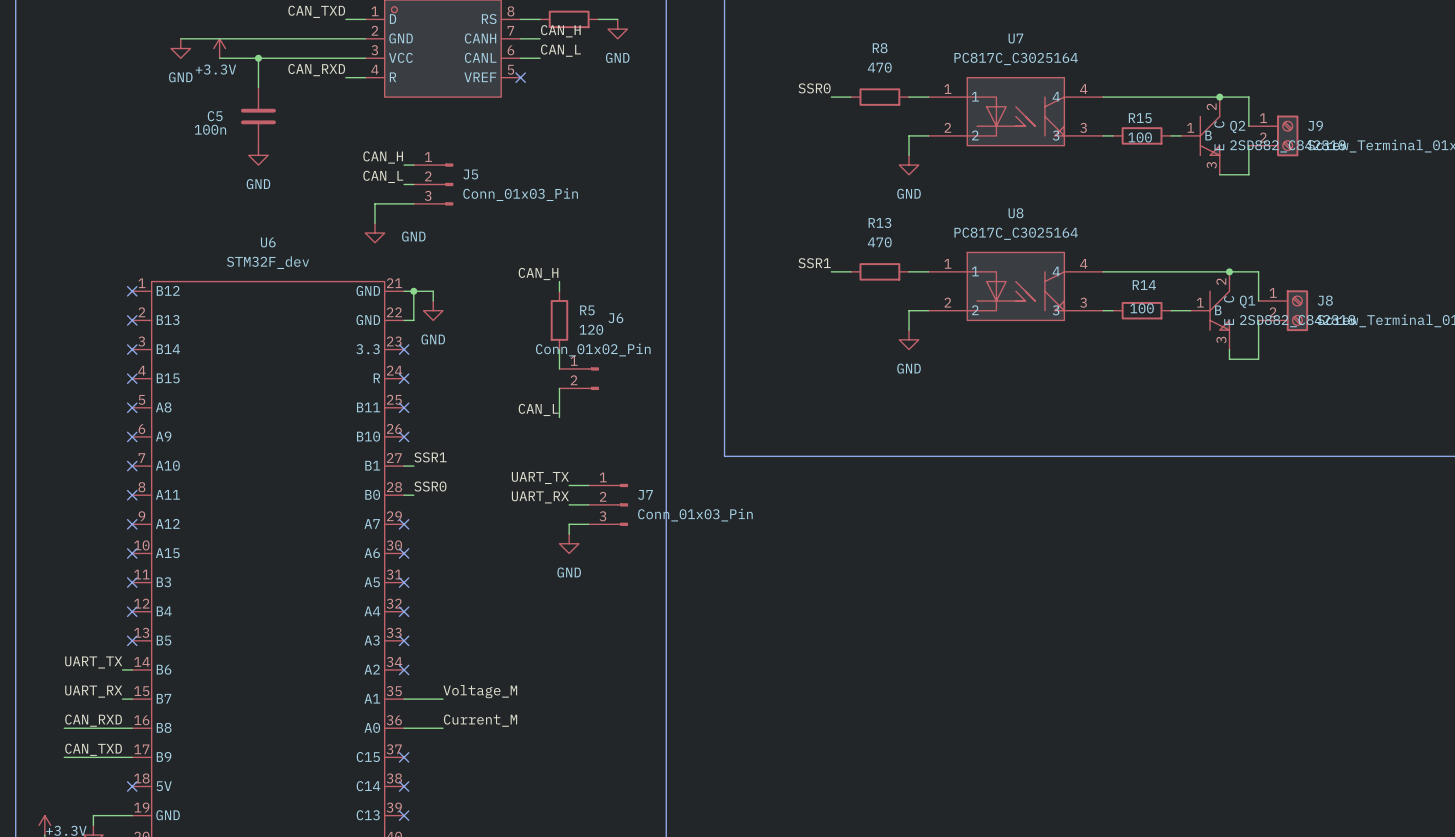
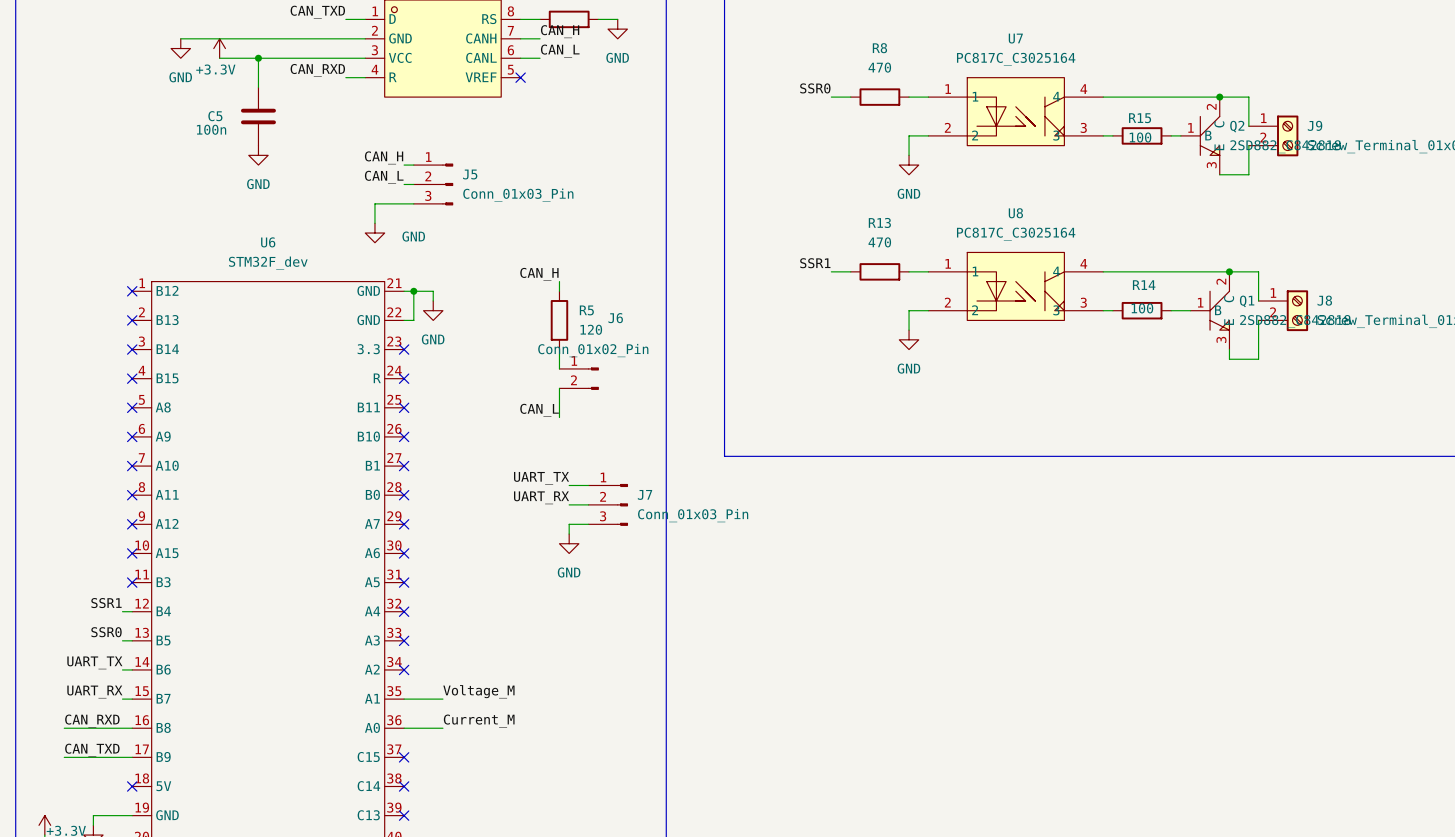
label: SSR1 (430, 457) -> none
wire: (404, 466) (413, 466) -> none
no-connect mark: none -> (404, 466)
label: SSR0 (430, 486) -> none
wire: (404, 495) (413, 495) -> none
no-connect mark: none -> (404, 495)
label: none -> SSR1 (106, 603)
wire: none -> (122, 611) (132, 611)
no-connect mark: (132, 611) -> none
label: none -> SSR0 (106, 632)
wire: none -> (122, 640) (132, 640)
no-connect mark: (132, 640) -> none

